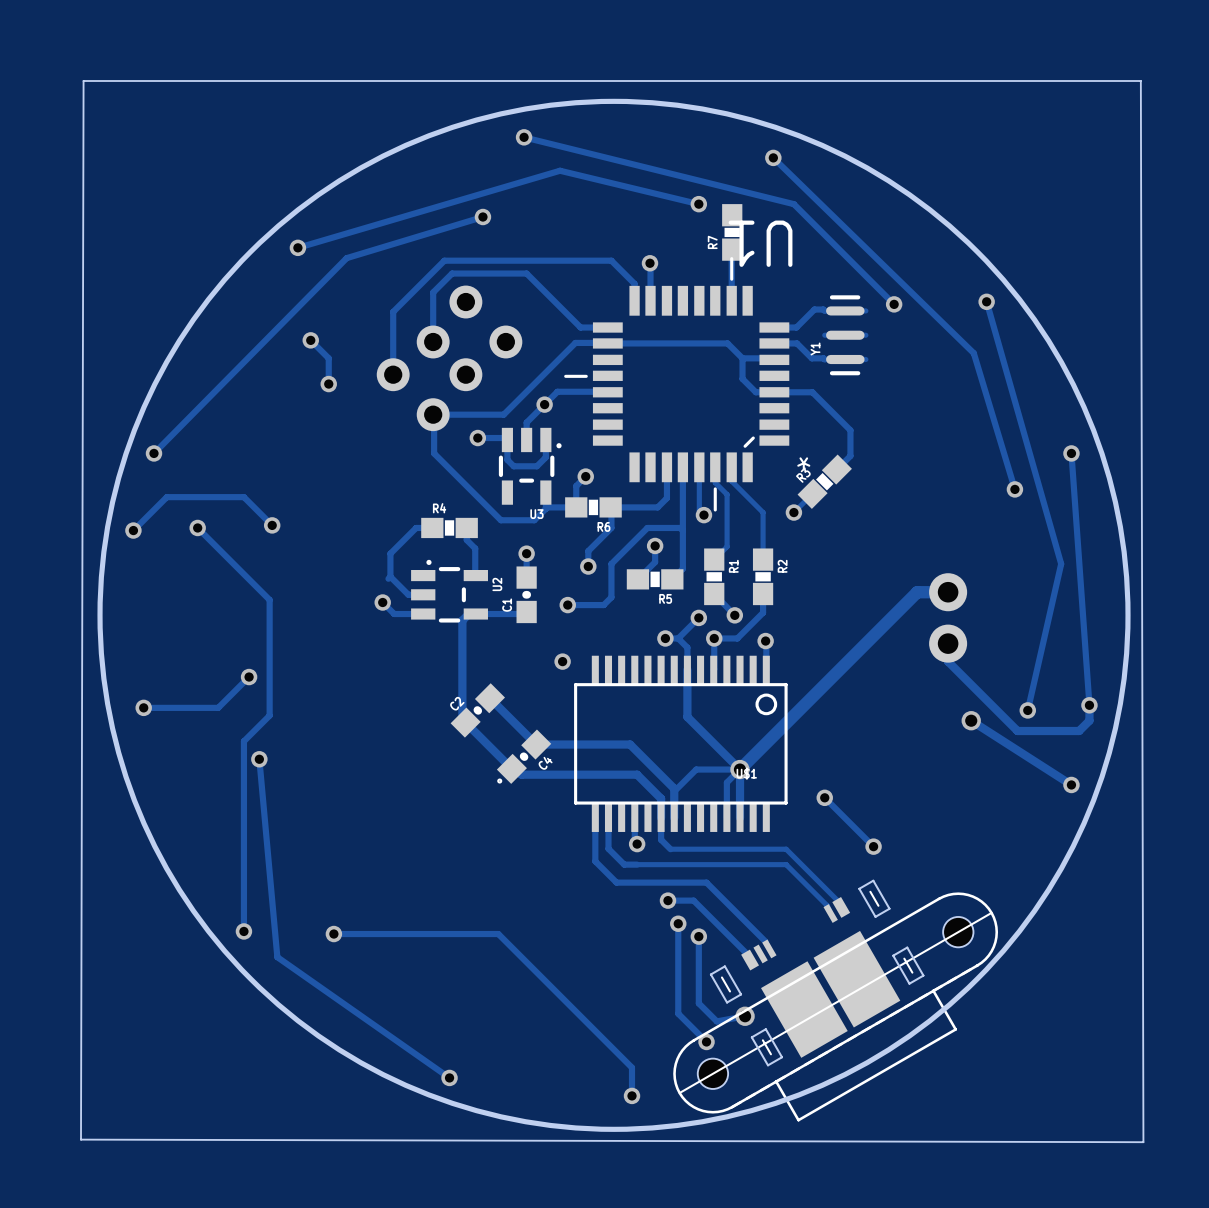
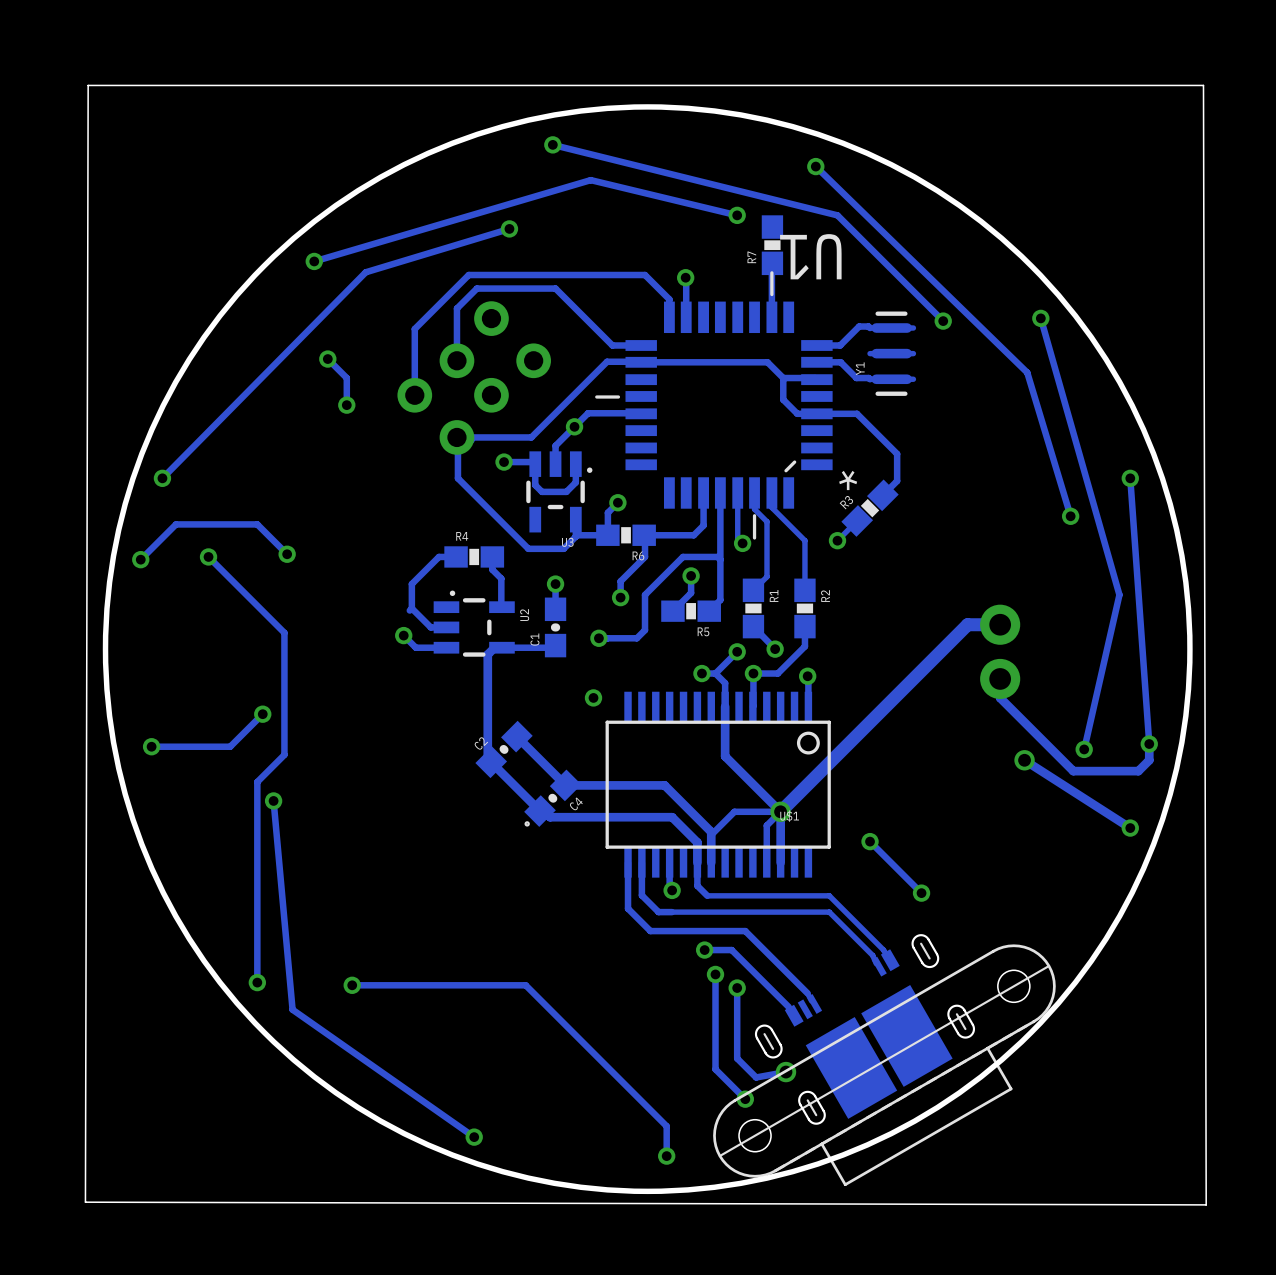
part footprint: [673, 879, 999, 1122] -> [713, 934, 1056, 1187]

